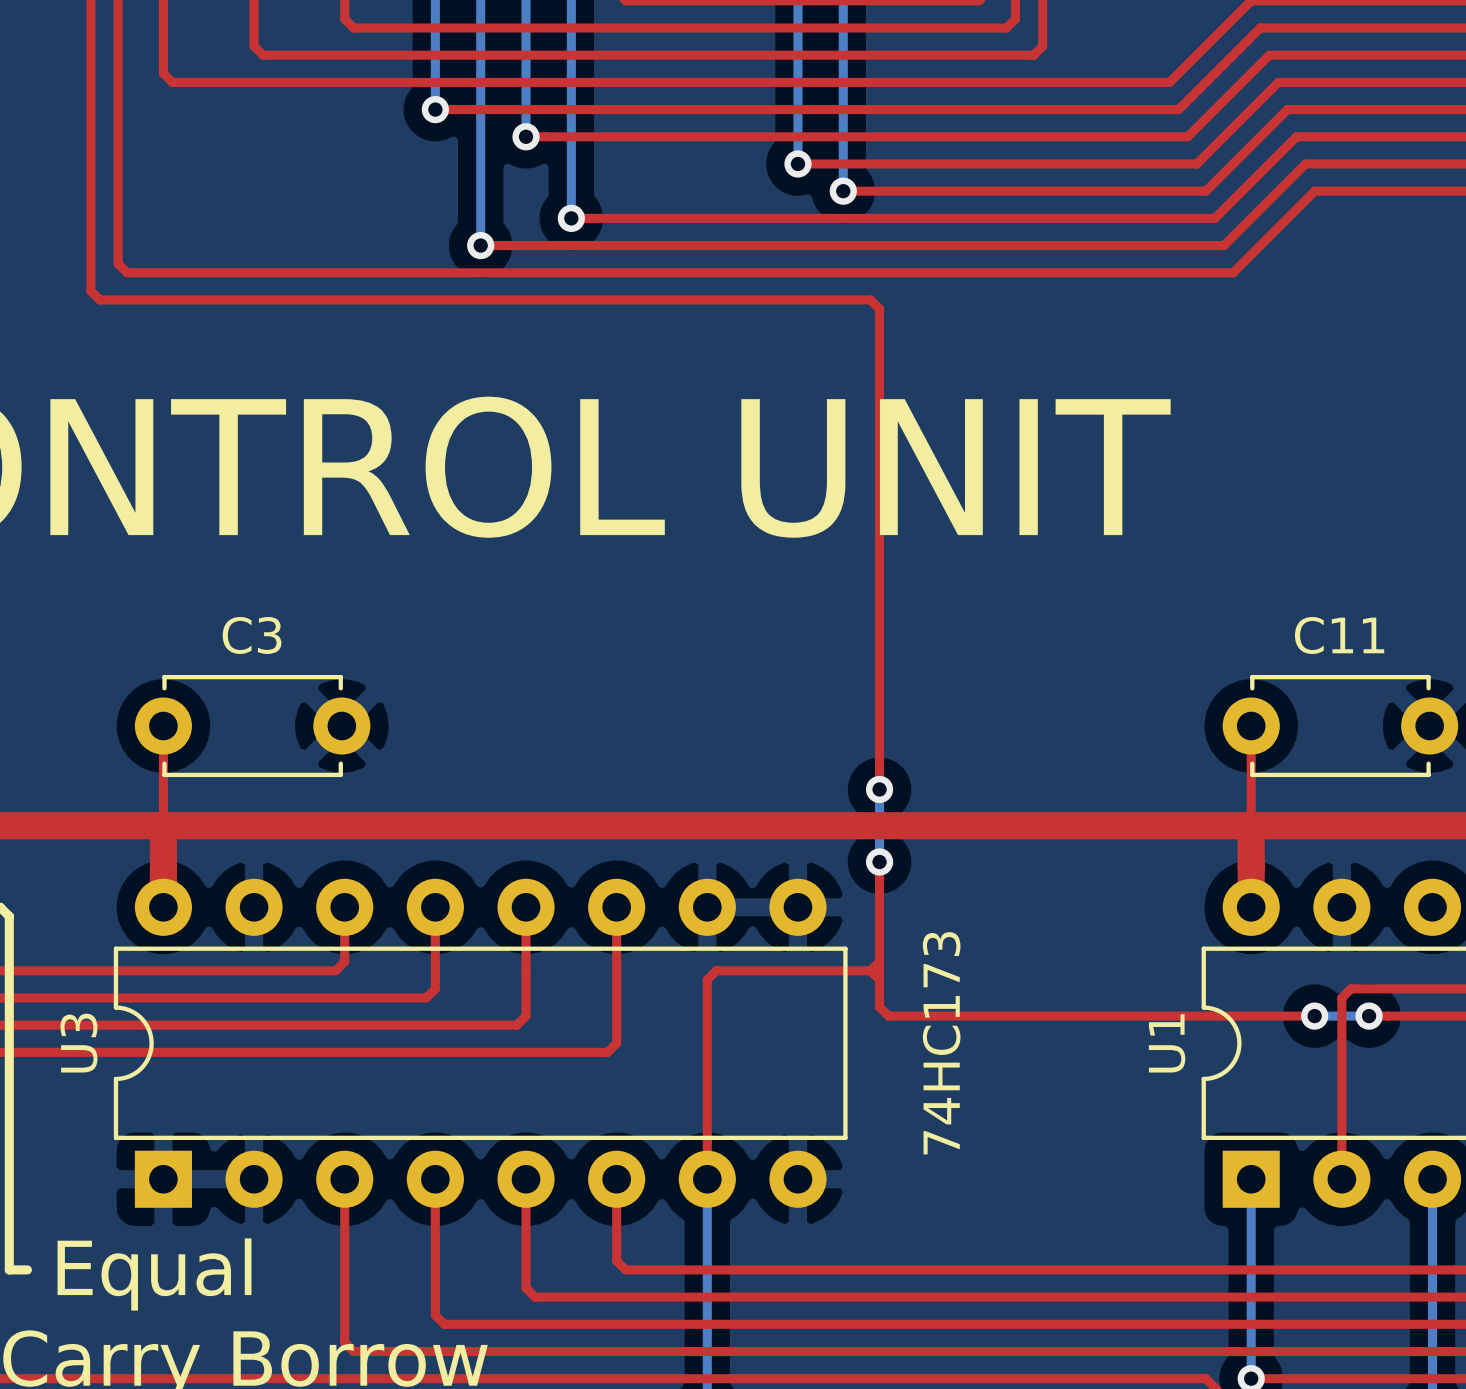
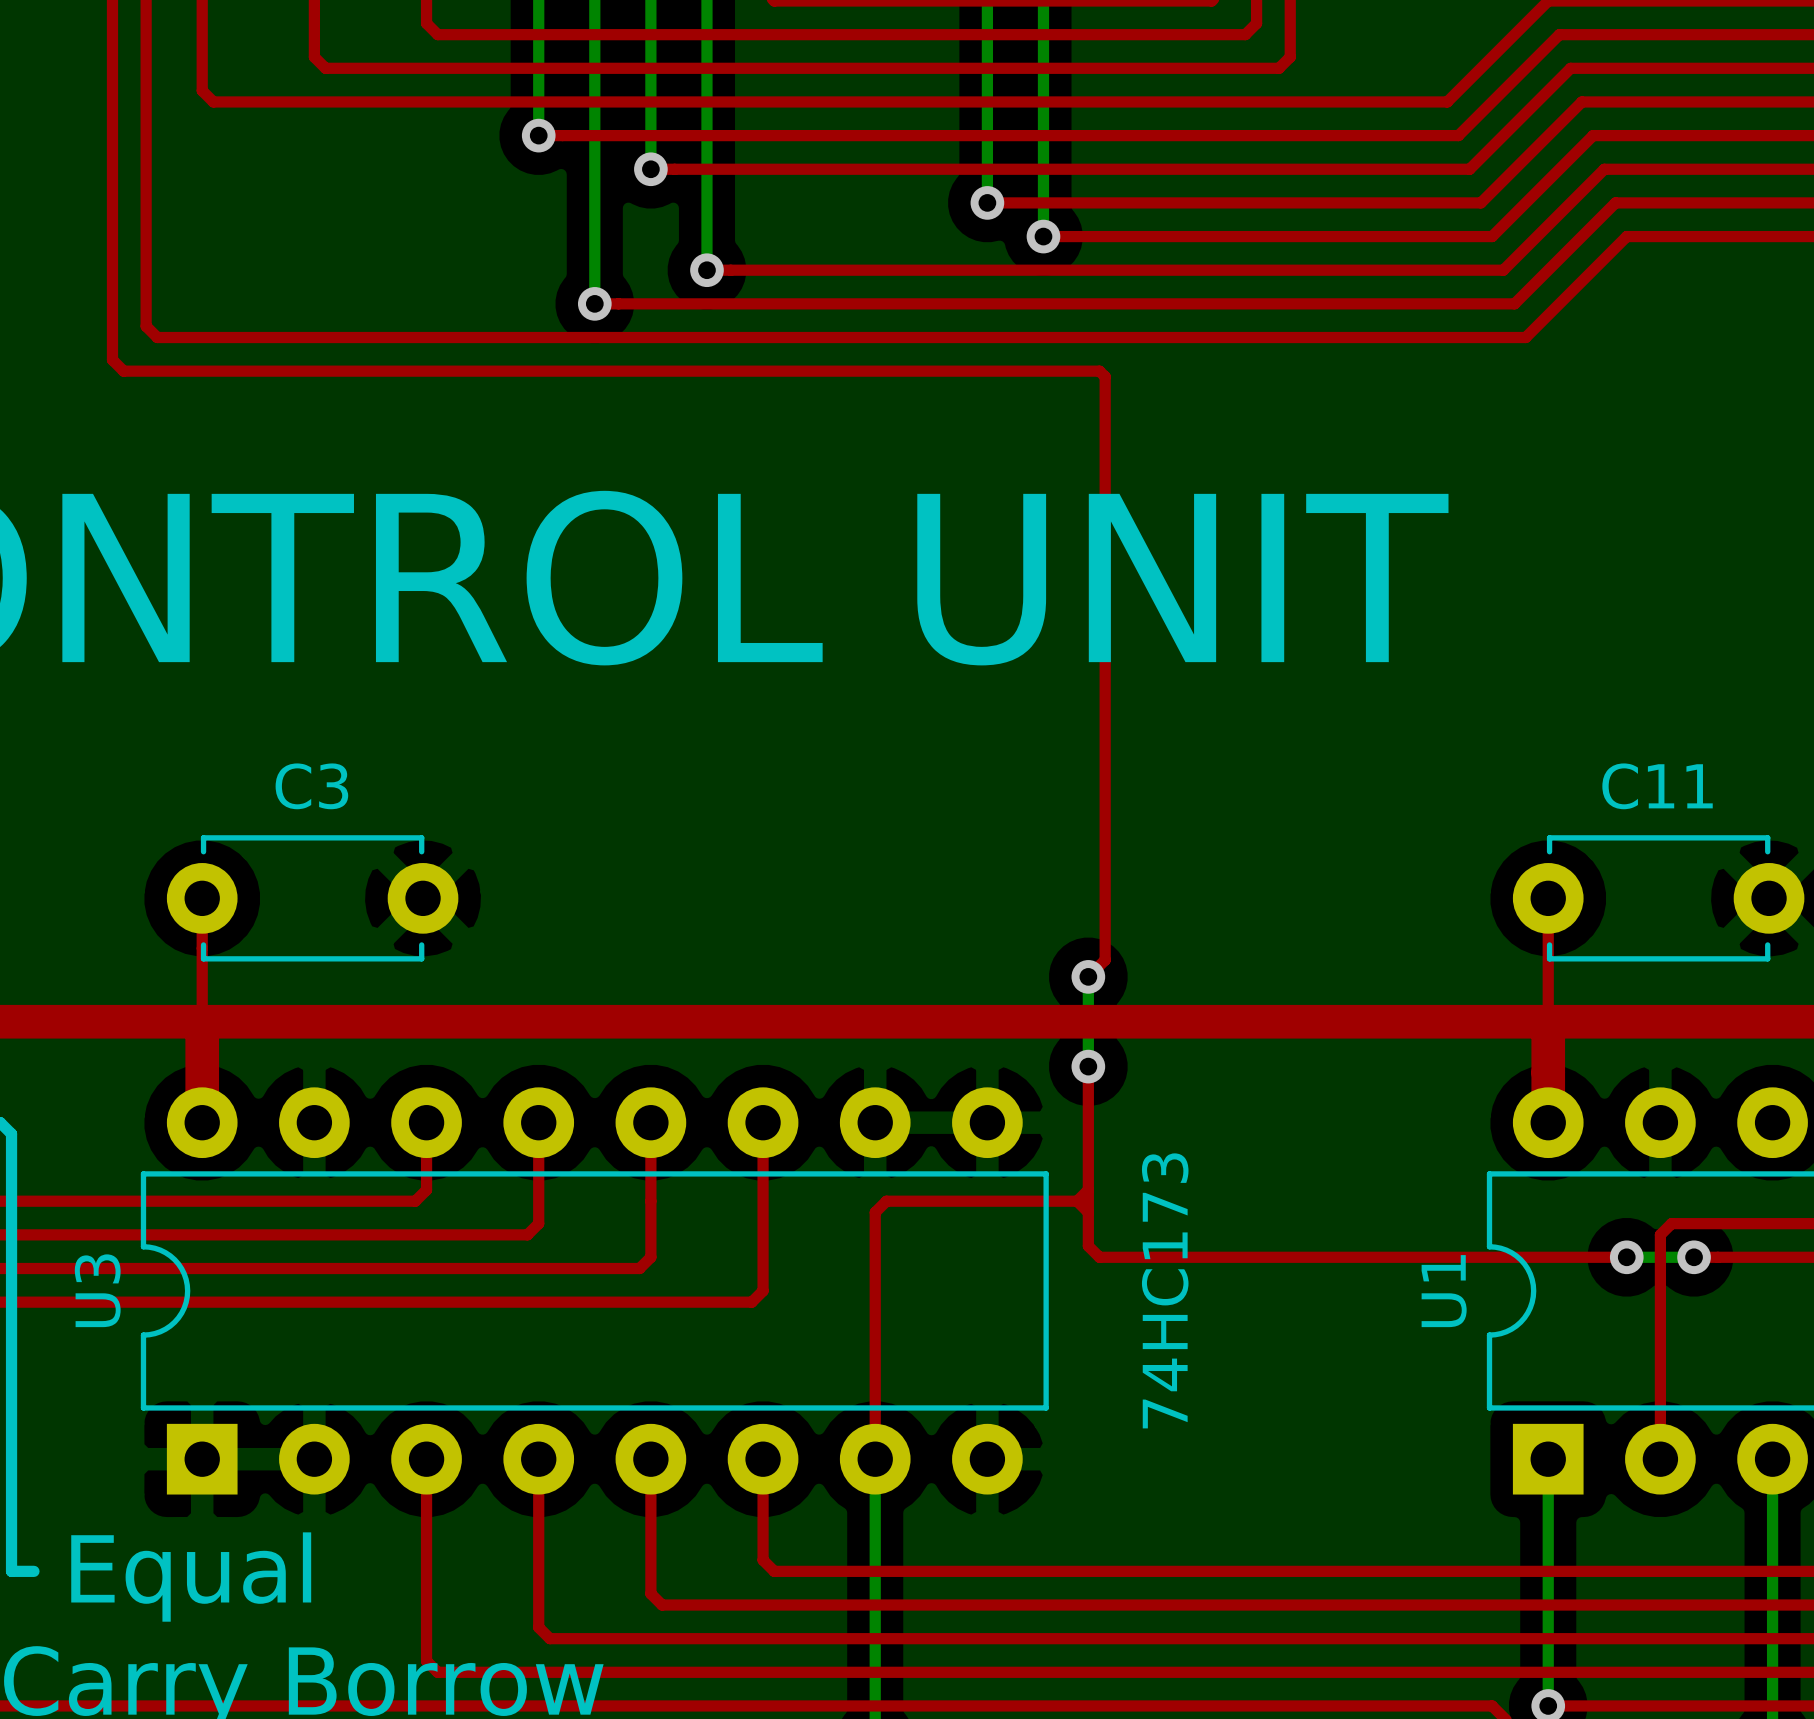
top track: (870, 299) (879, 309) (879, 789) -> (1077, 371) (1099, 371) (1105, 376) (1105, 960) (1088, 976)

